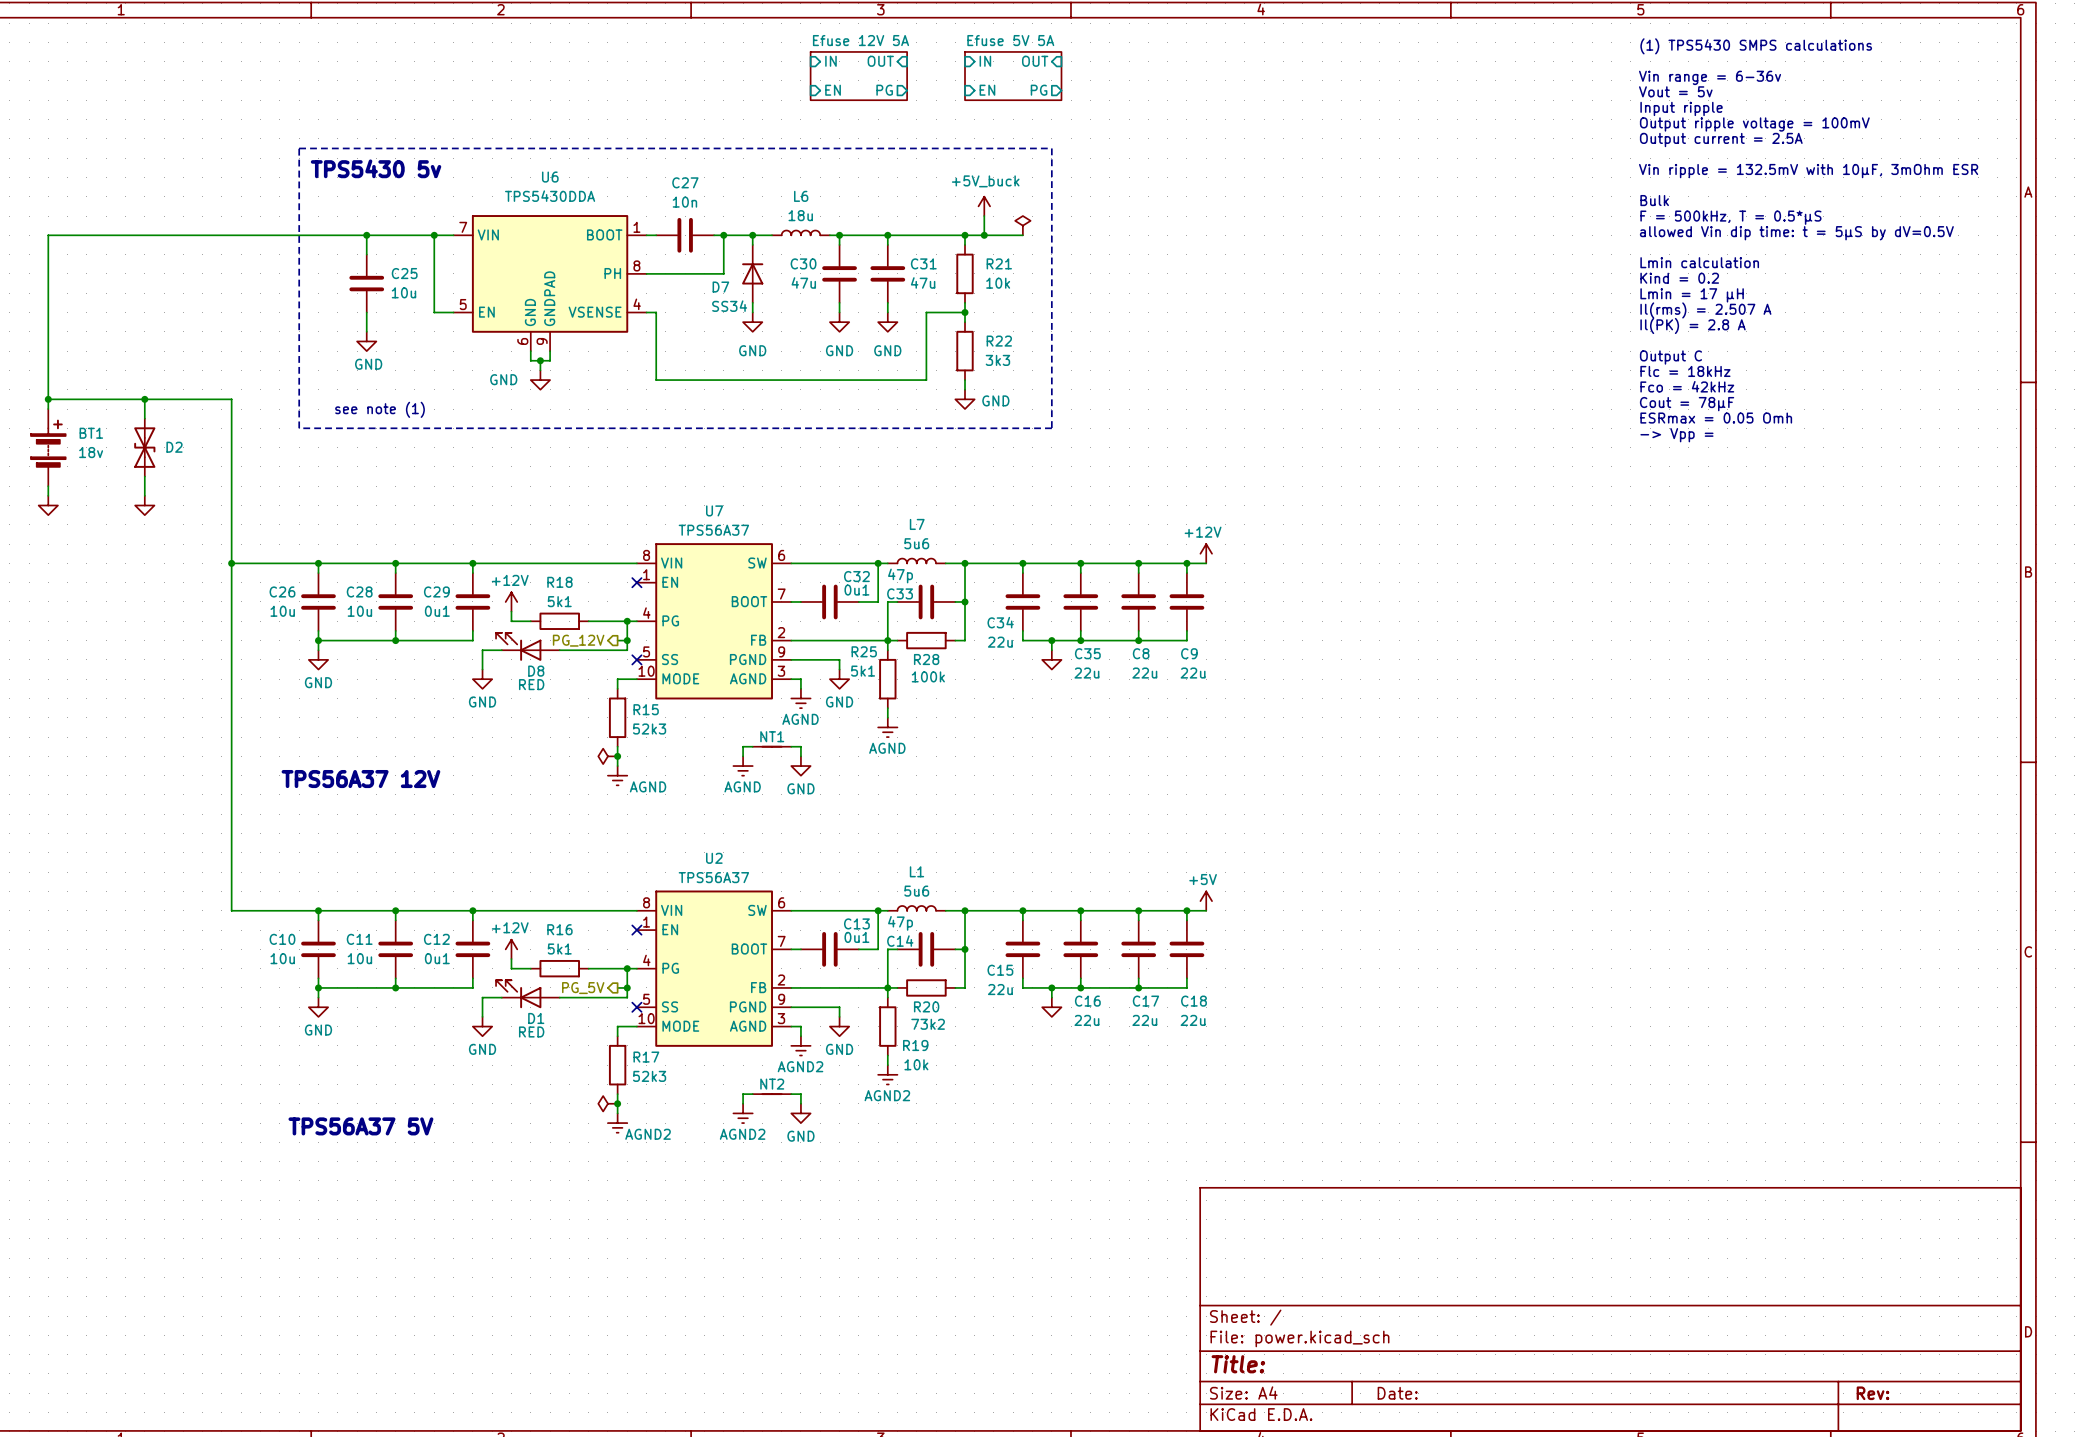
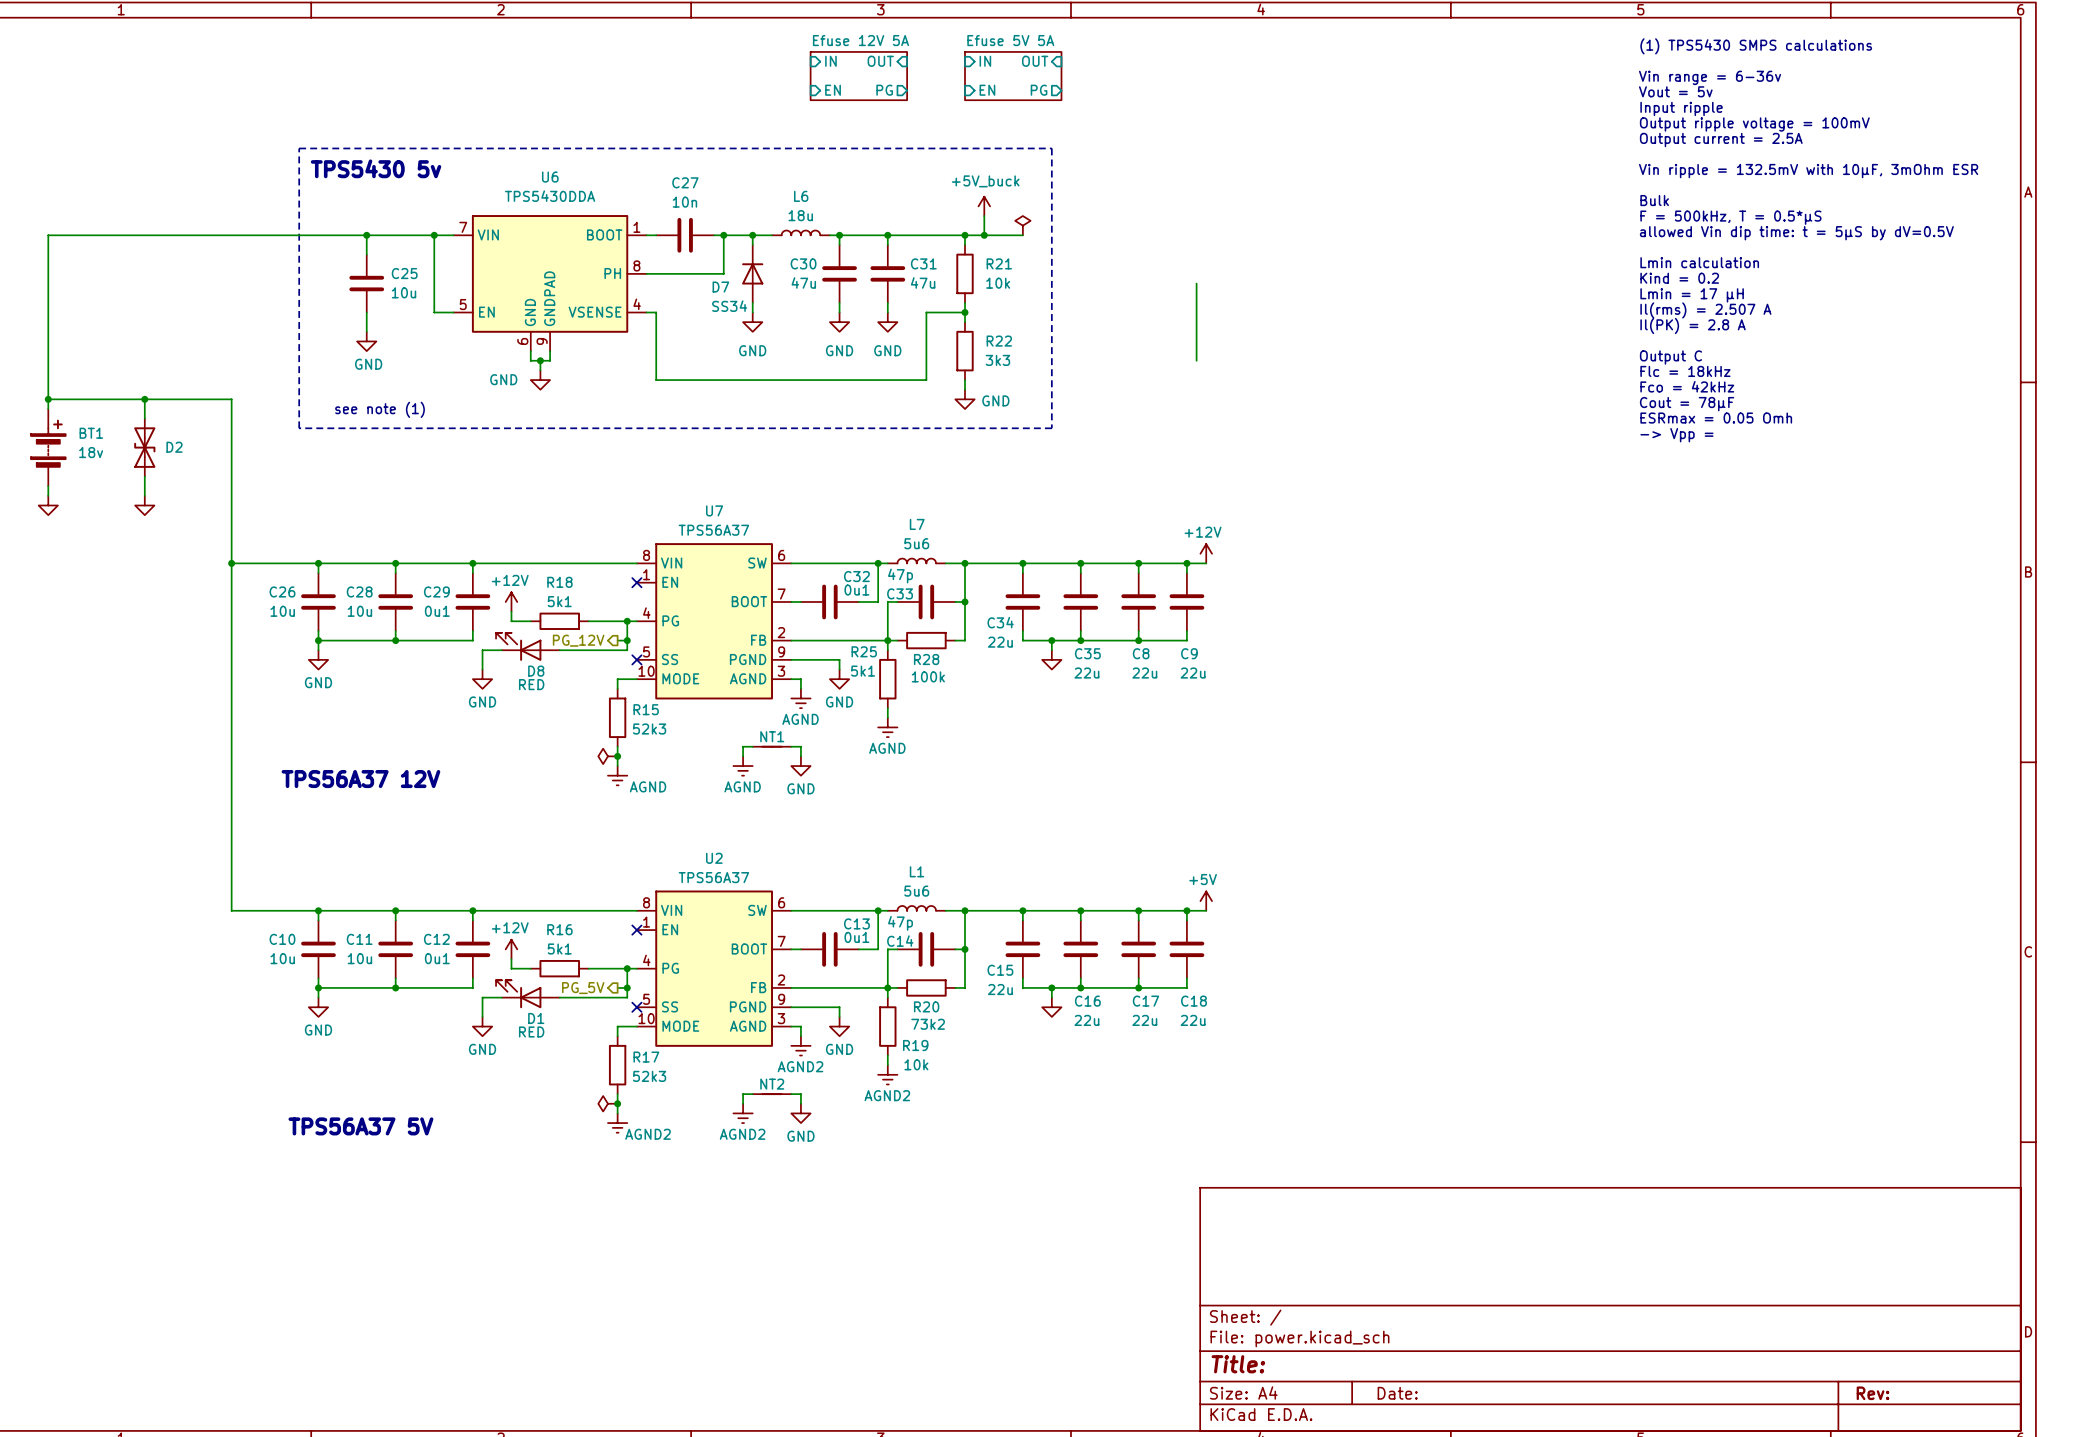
wire: none -> (1196, 283) (1196, 360)

